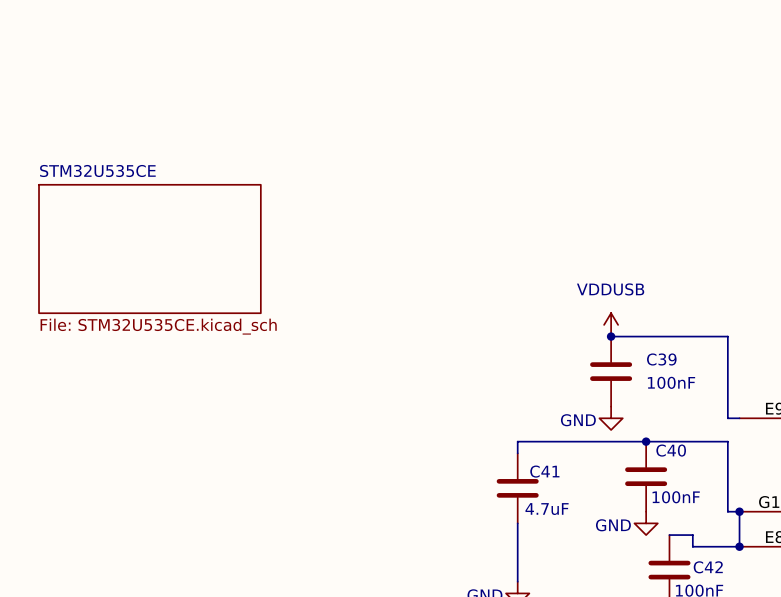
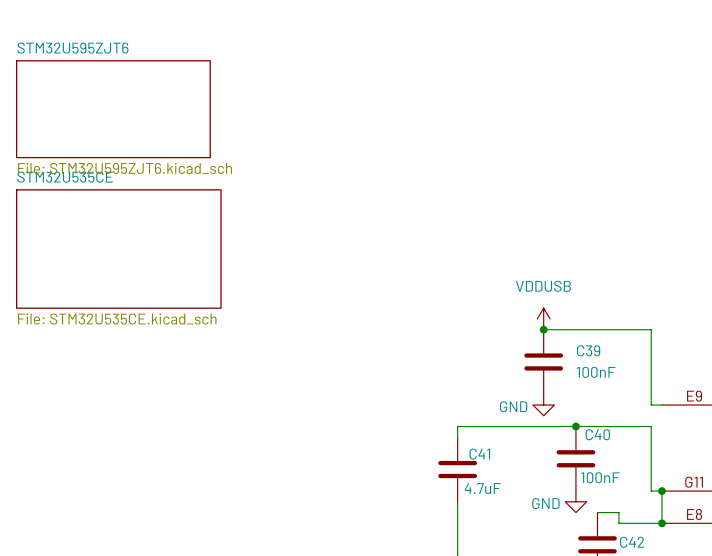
sheet STM32U595ZJT6: none -> File: STM32U595ZJT6.kicad_sch (113, 109)

